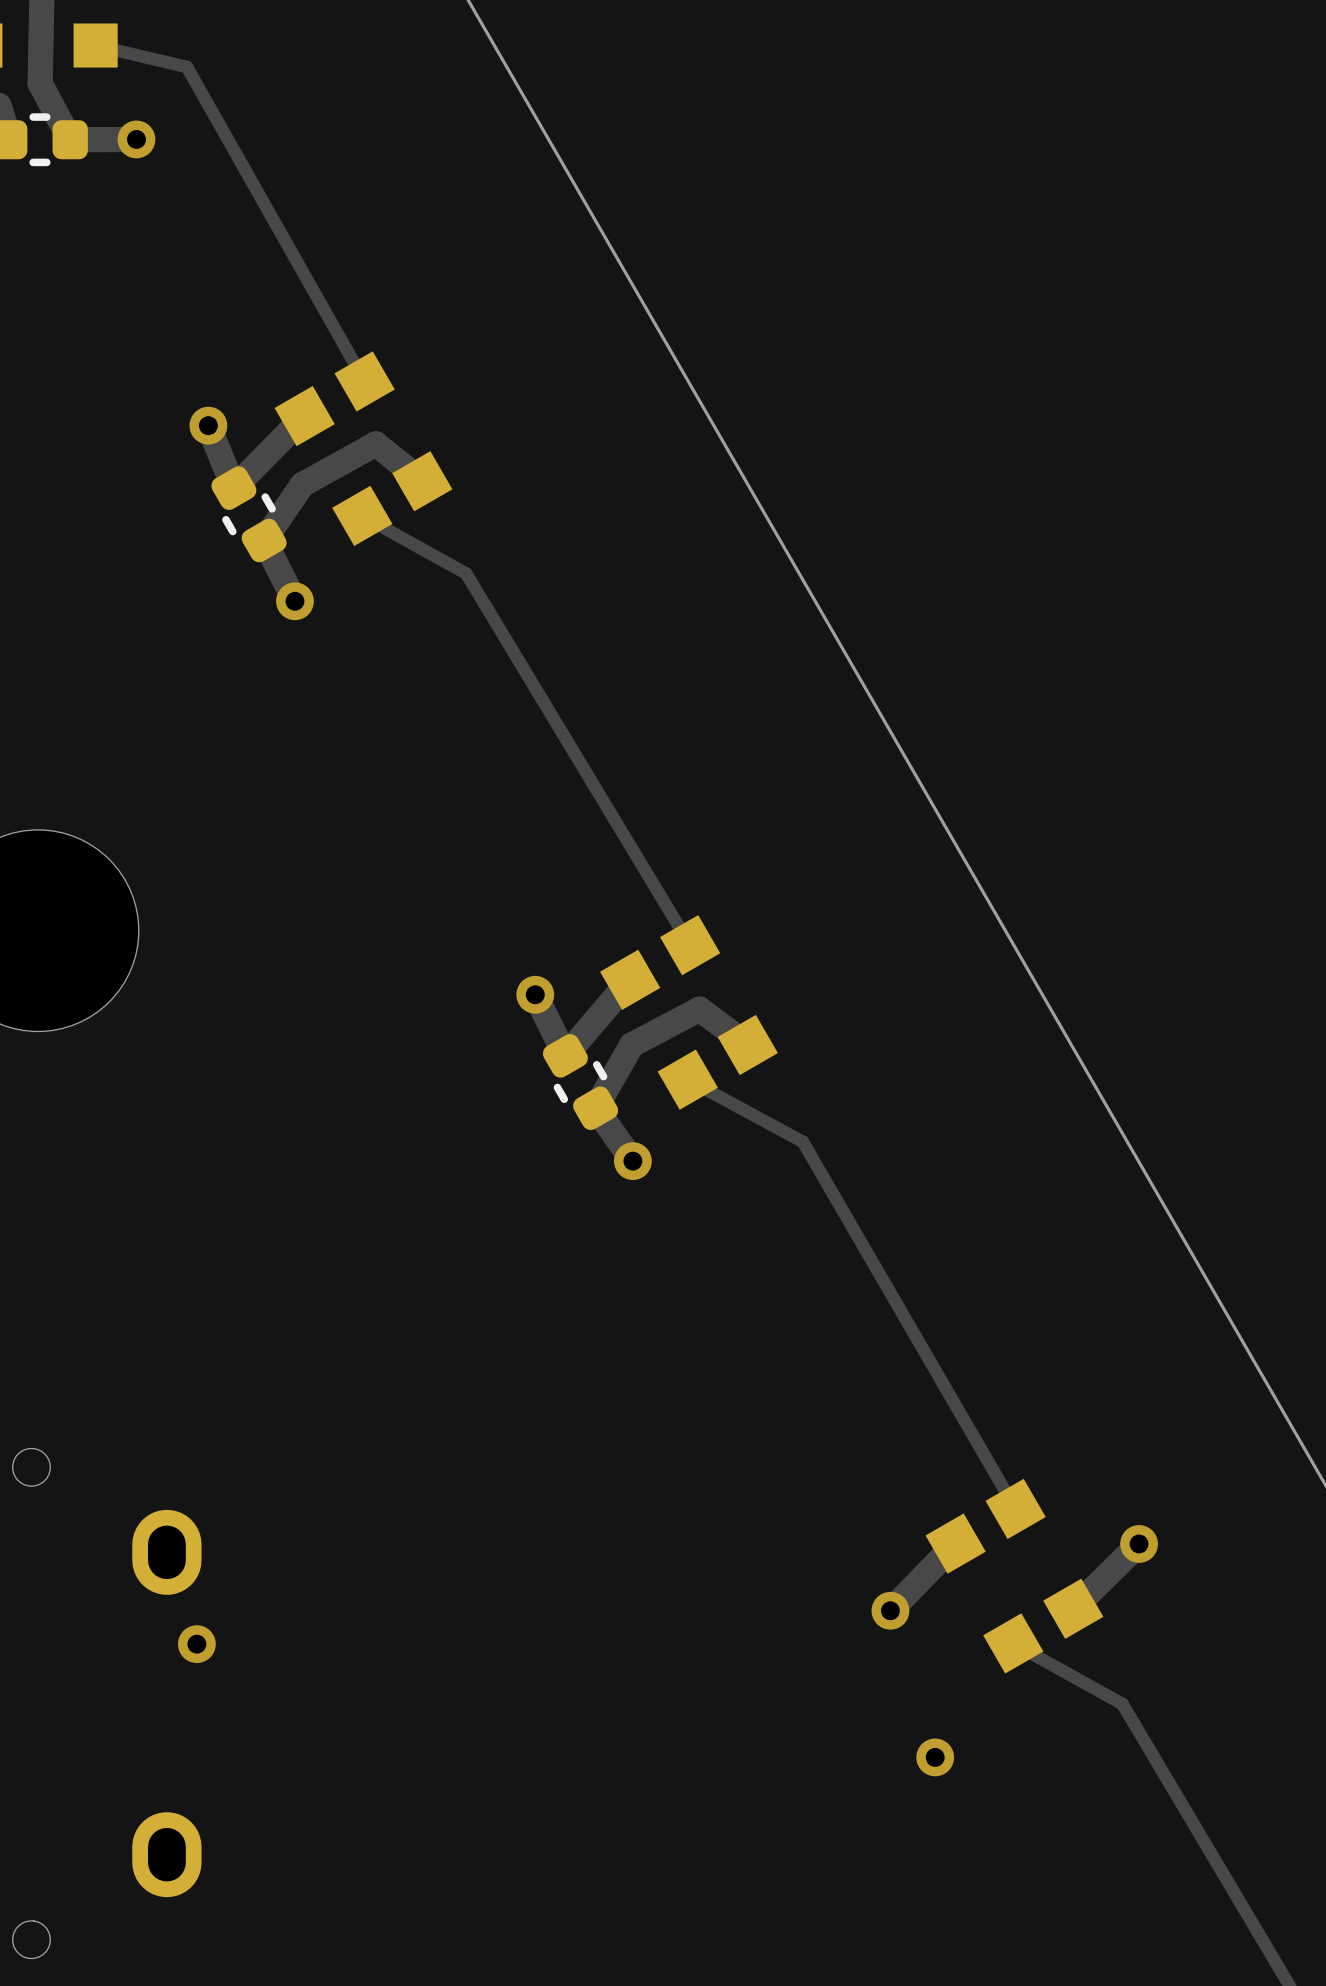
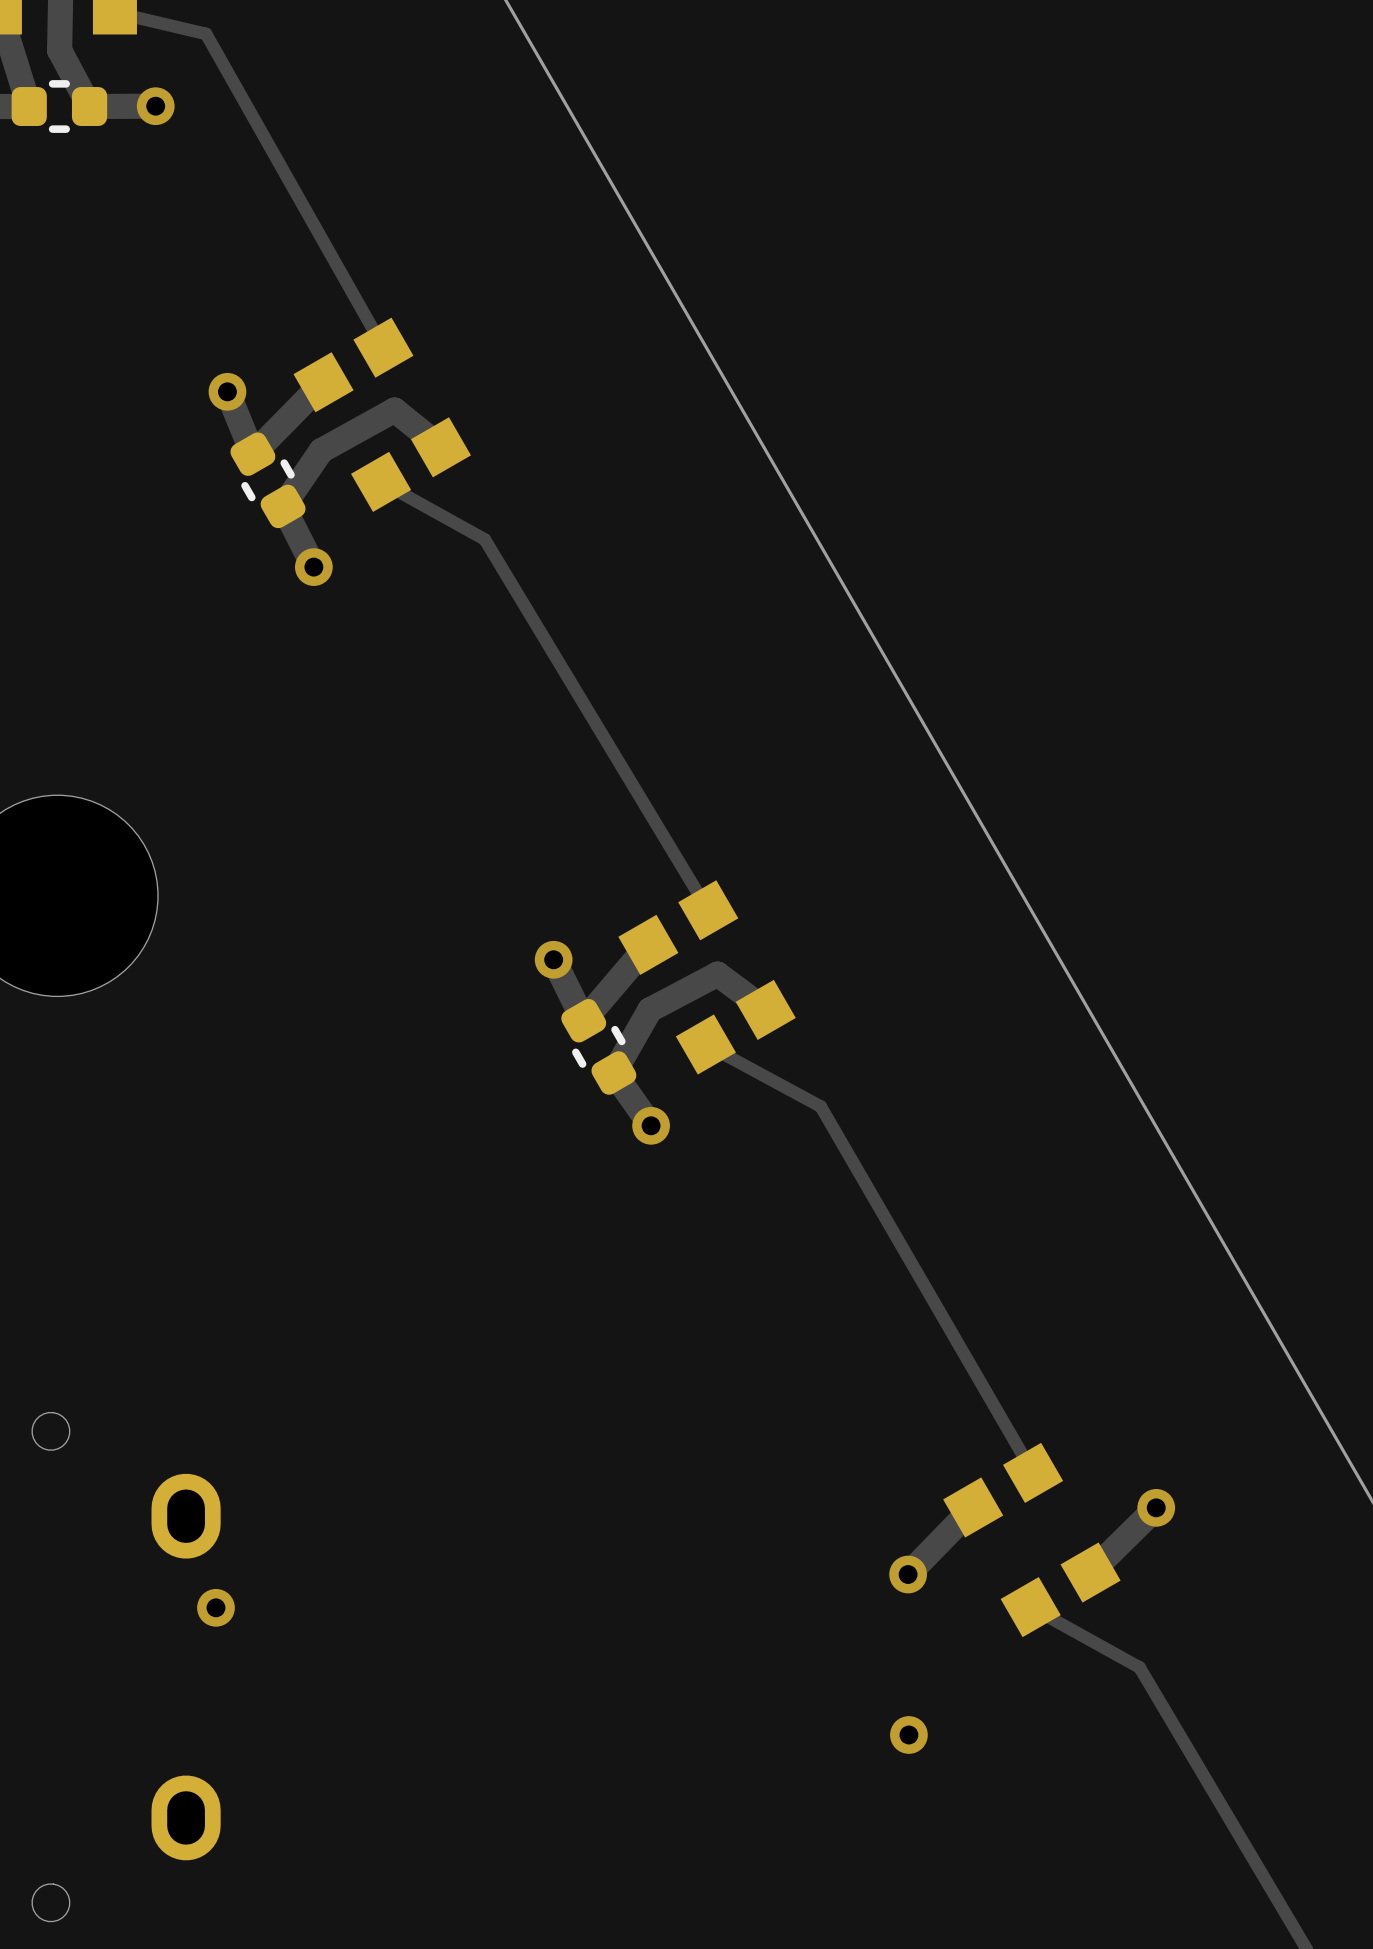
via position: (935, 1757) -> (908, 1734)

